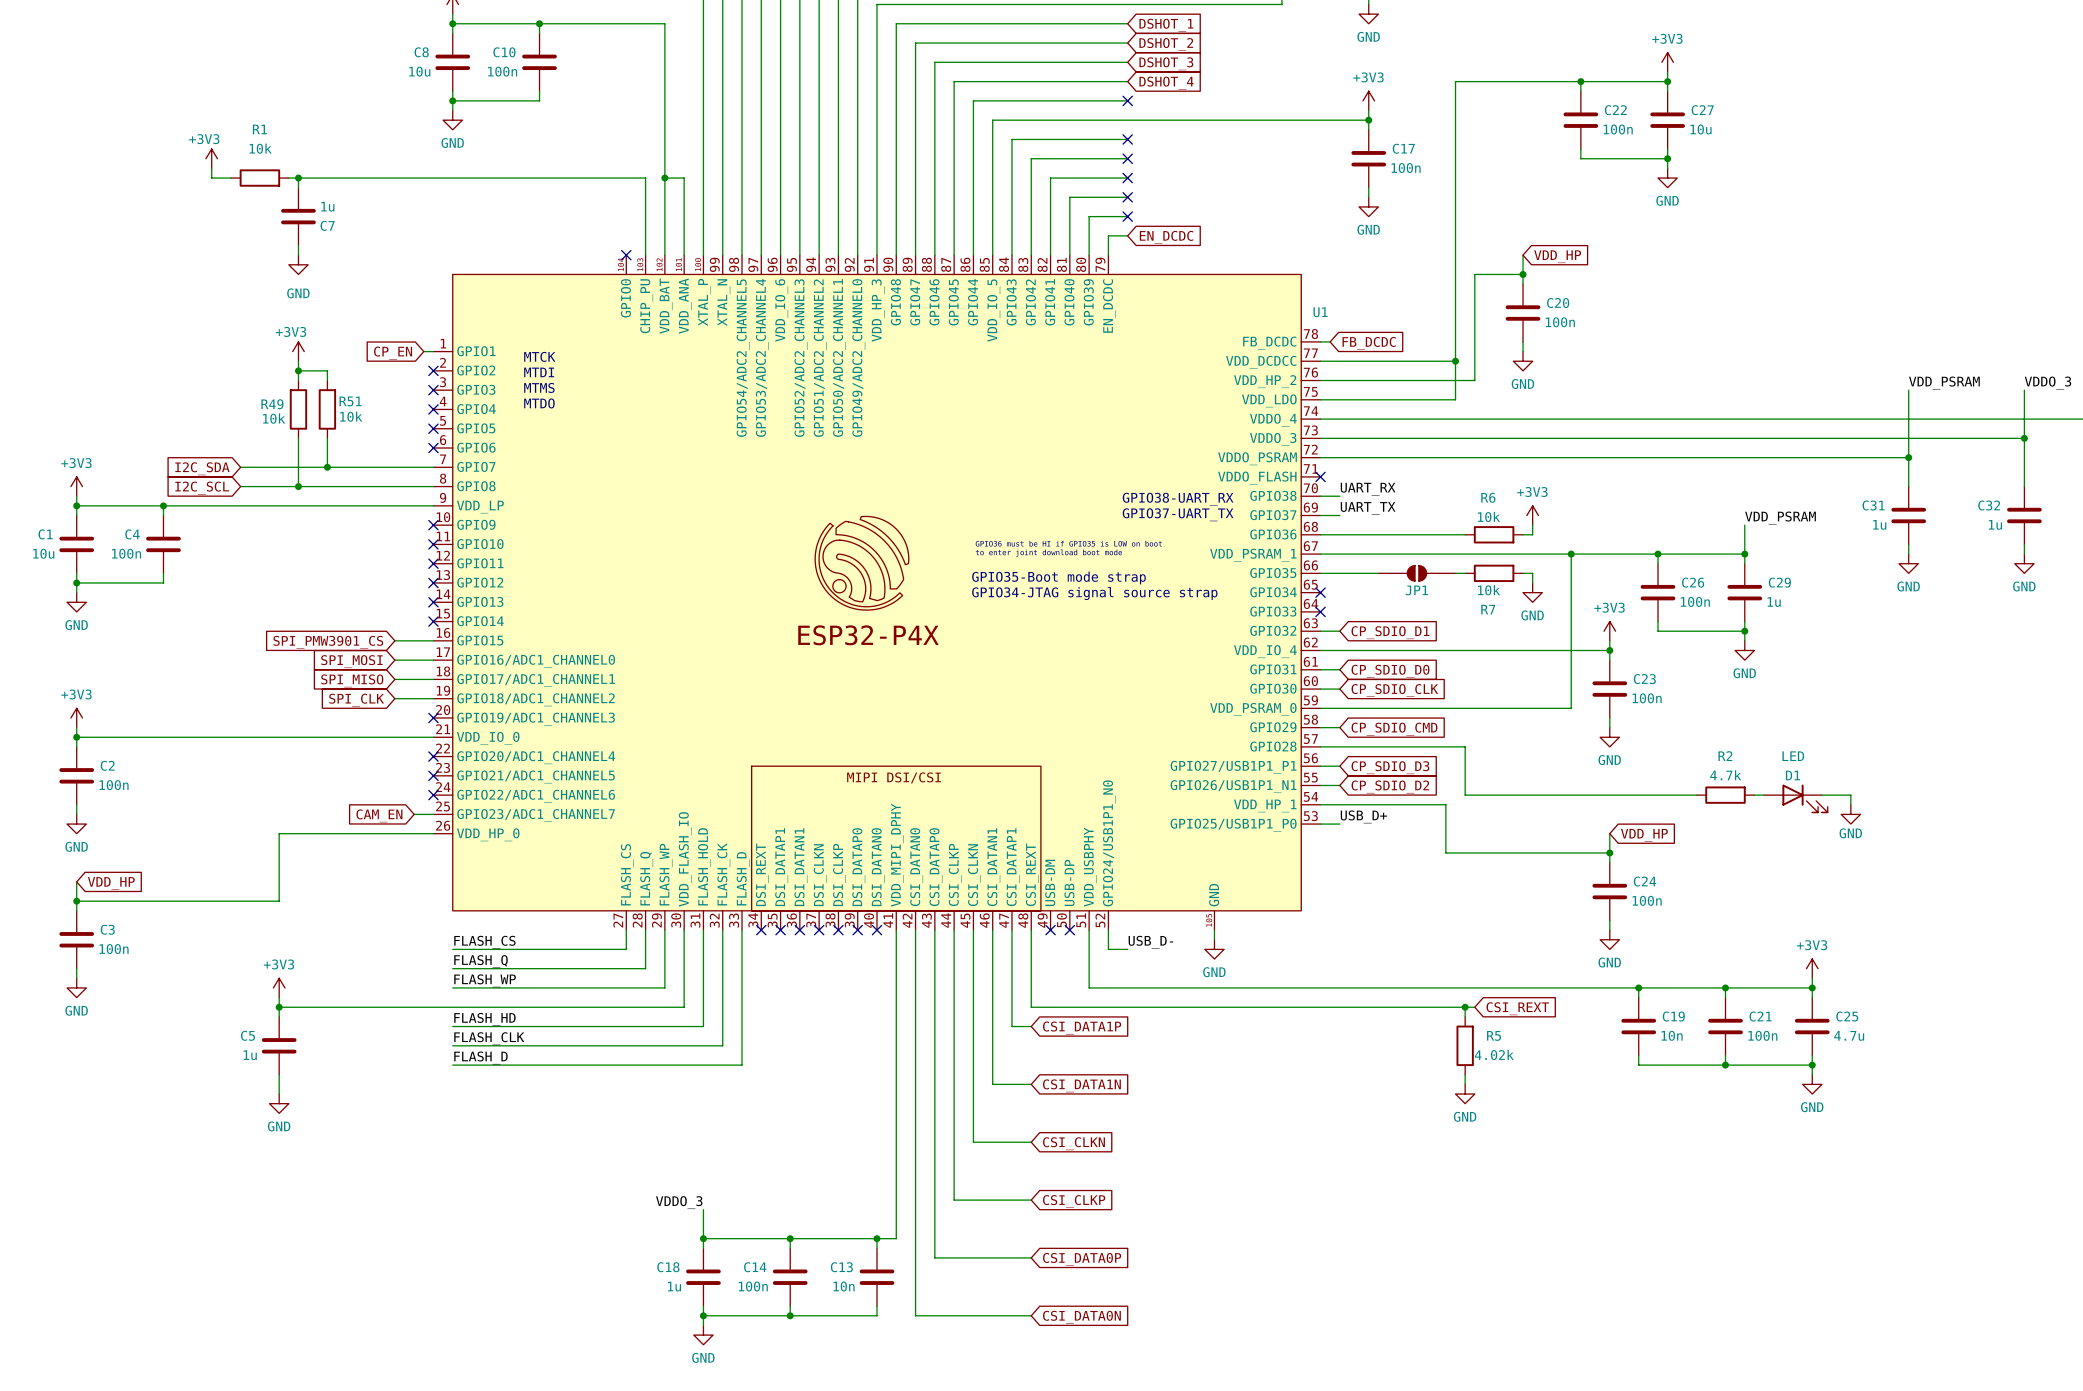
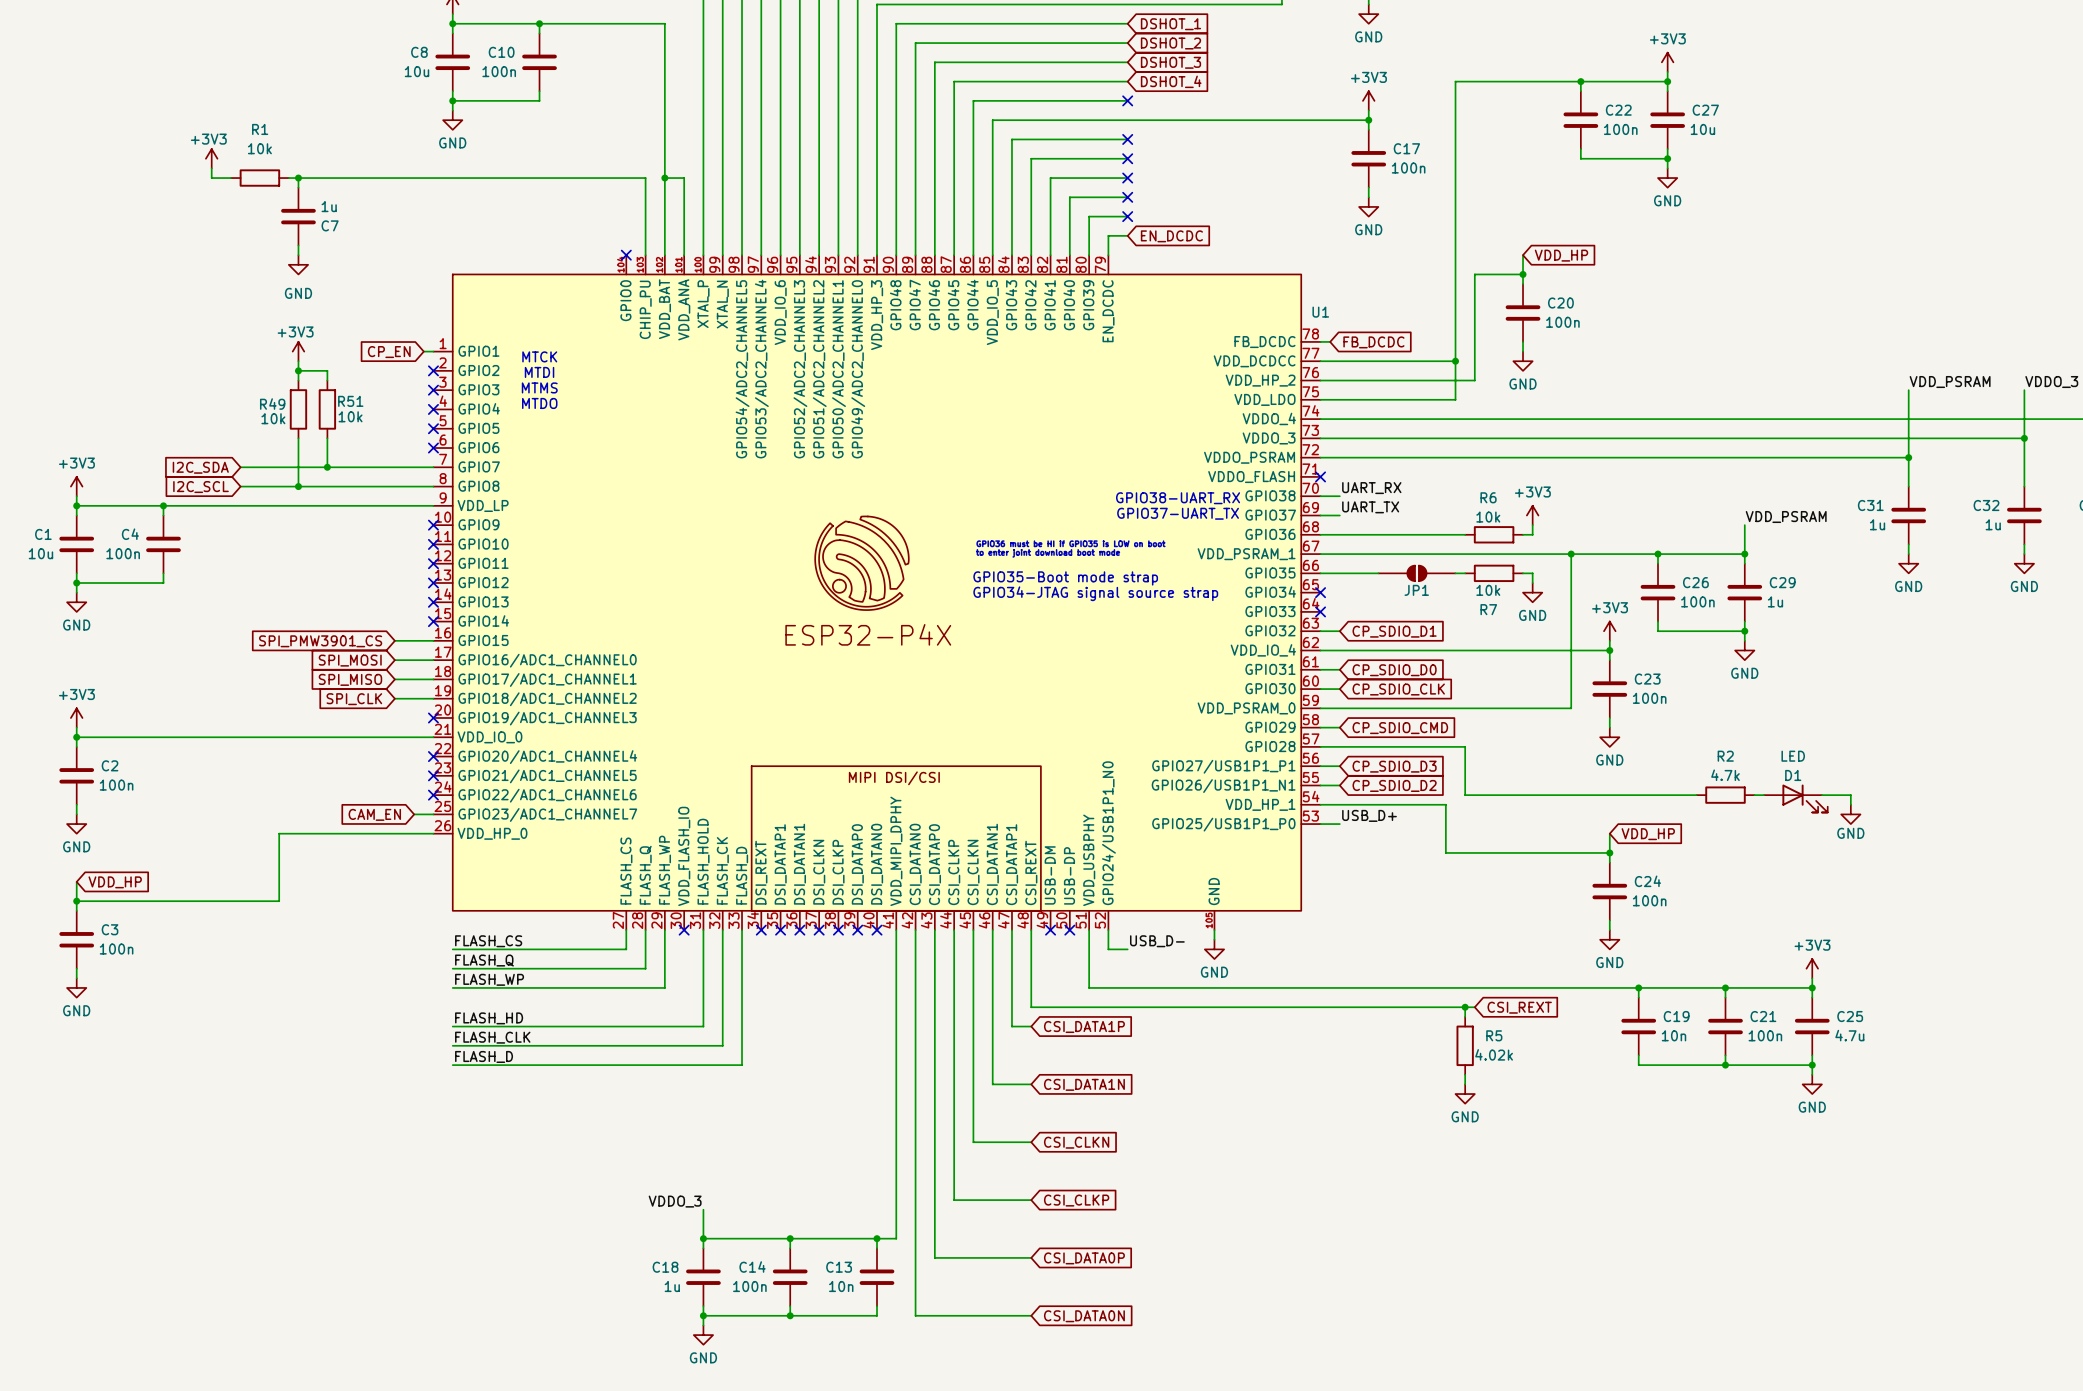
wire: (684, 930) (684, 1007) (279, 1007) -> none
no-connect mark: none -> (684, 930)
power symbol: +3V3 (279, 987) -> none
wire: (279, 997) (279, 1016) -> none
junction: (279, 1007) -> none
C5: 1u (279, 1045) -> none
wire: (279, 1074) (279, 1094) -> none
power symbol: GND (279, 1103) -> none

